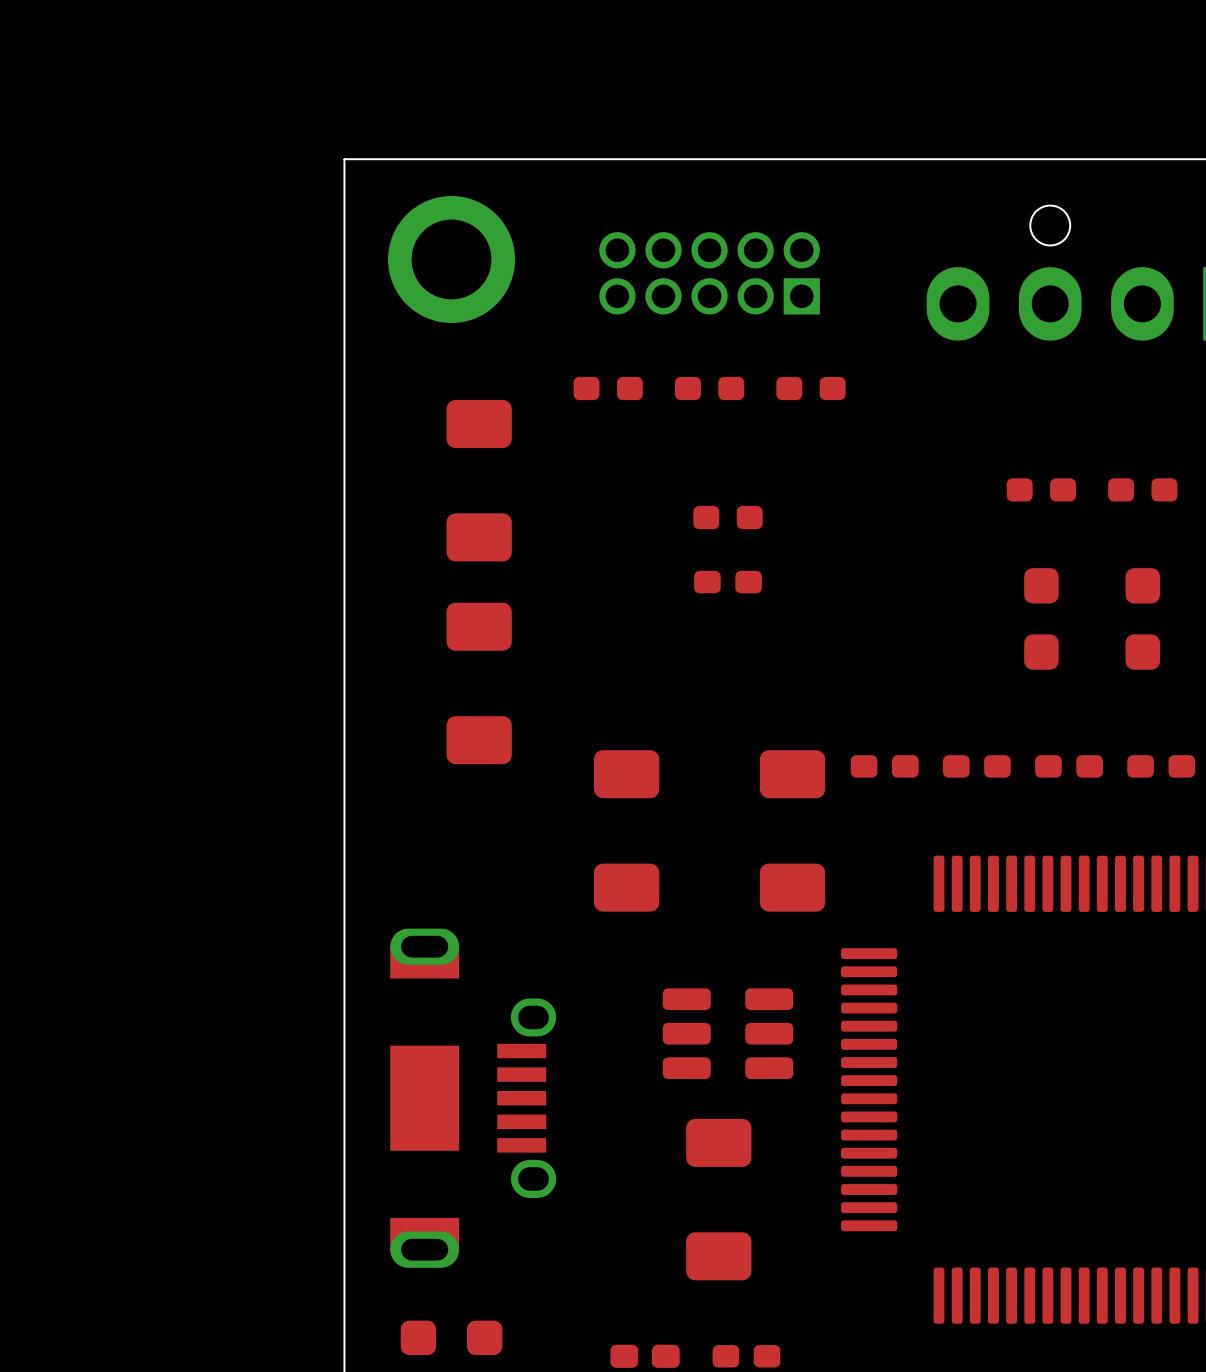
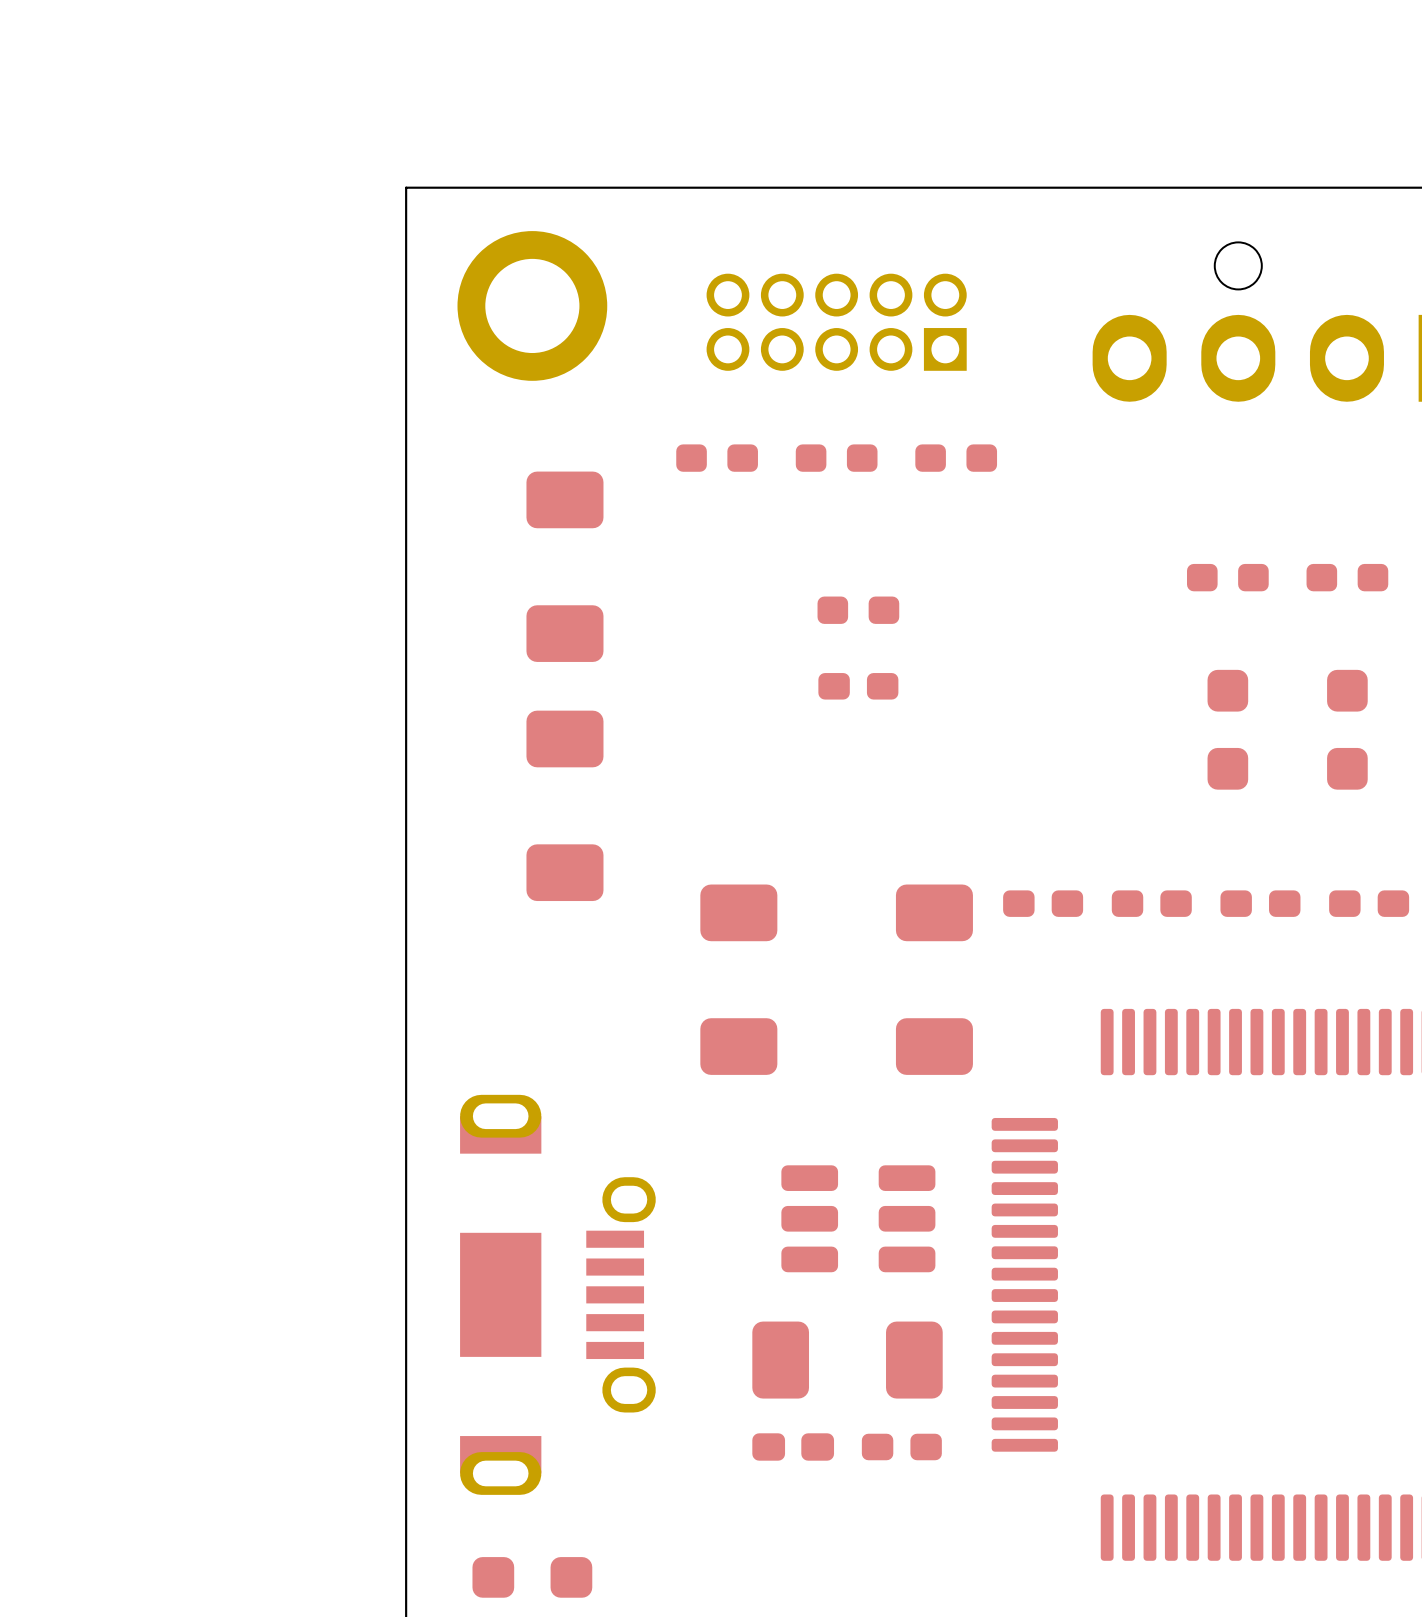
part rotation: 0° (718, 1199) -> 90° clockwise (847, 1360)
part position: (645, 1356) -> (793, 1446)
part position: (746, 1356) -> (901, 1446)

